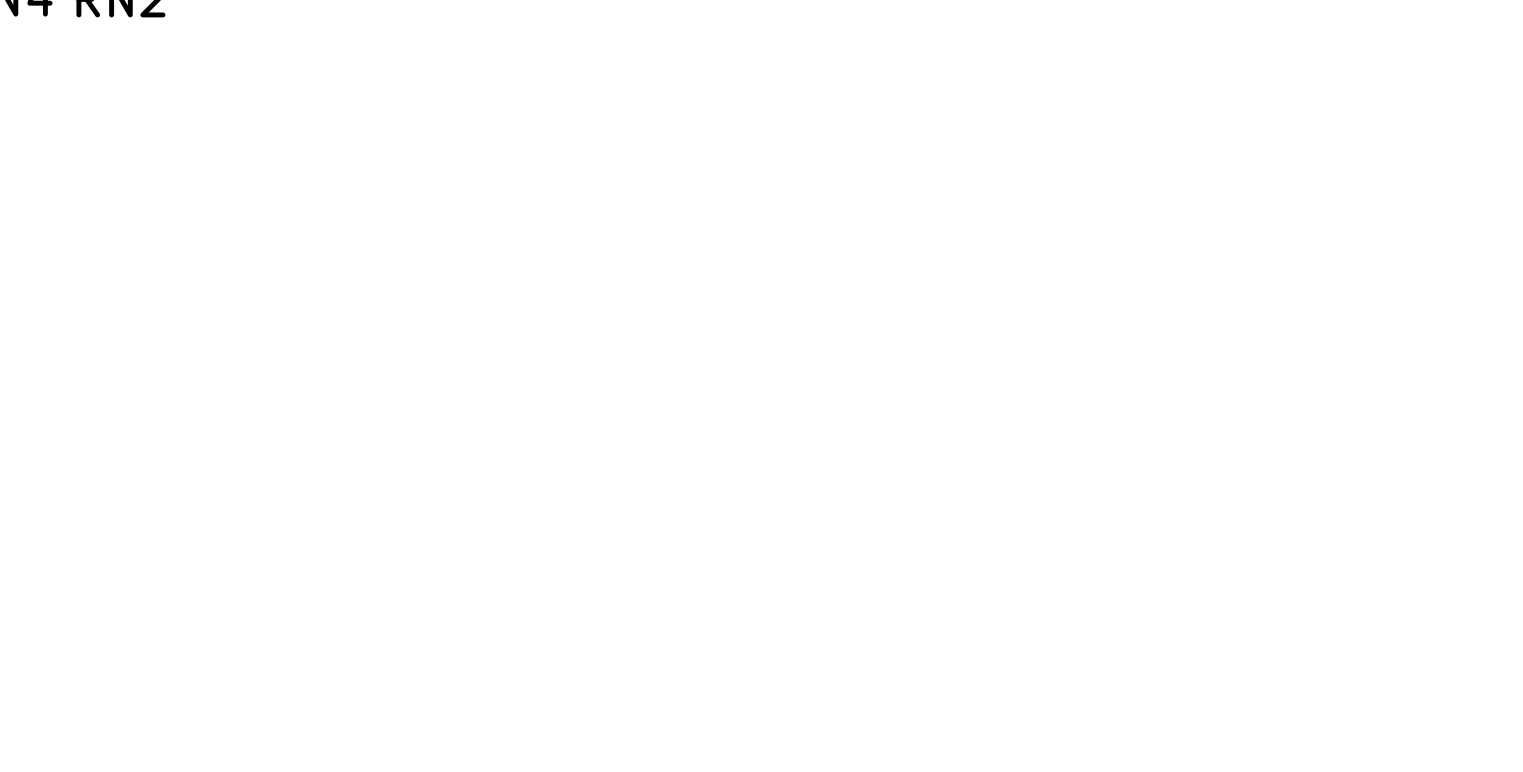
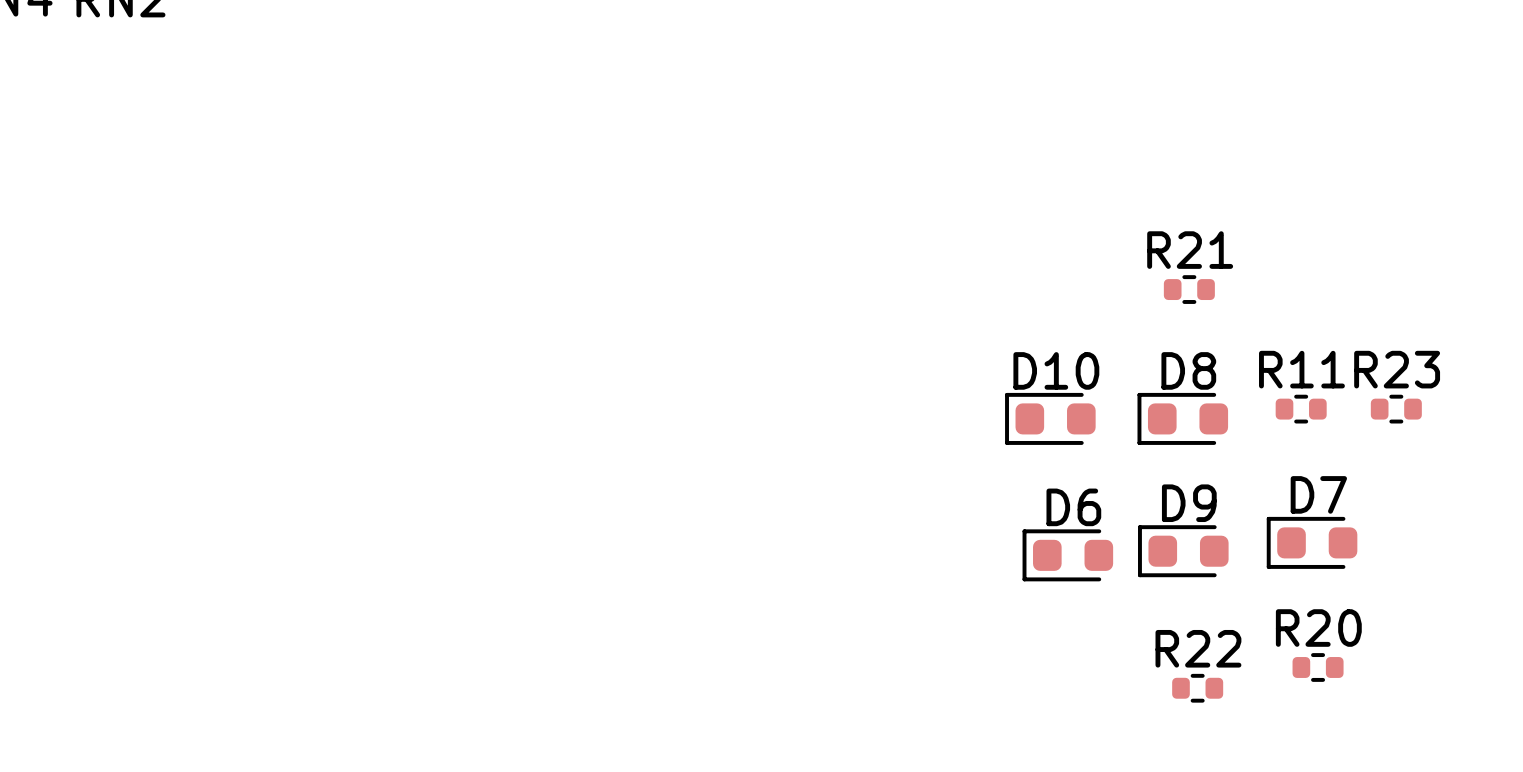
R21: none -> (1189, 289)
R11: none -> (1301, 409)
R23: none -> (1396, 409)
D10: none -> (1050, 418)
D8: none -> (1182, 418)
D7: none -> (1312, 542)
D9: none -> (1183, 551)
D6: none -> (1067, 555)
R20: none -> (1318, 667)
R22: none -> (1197, 688)

